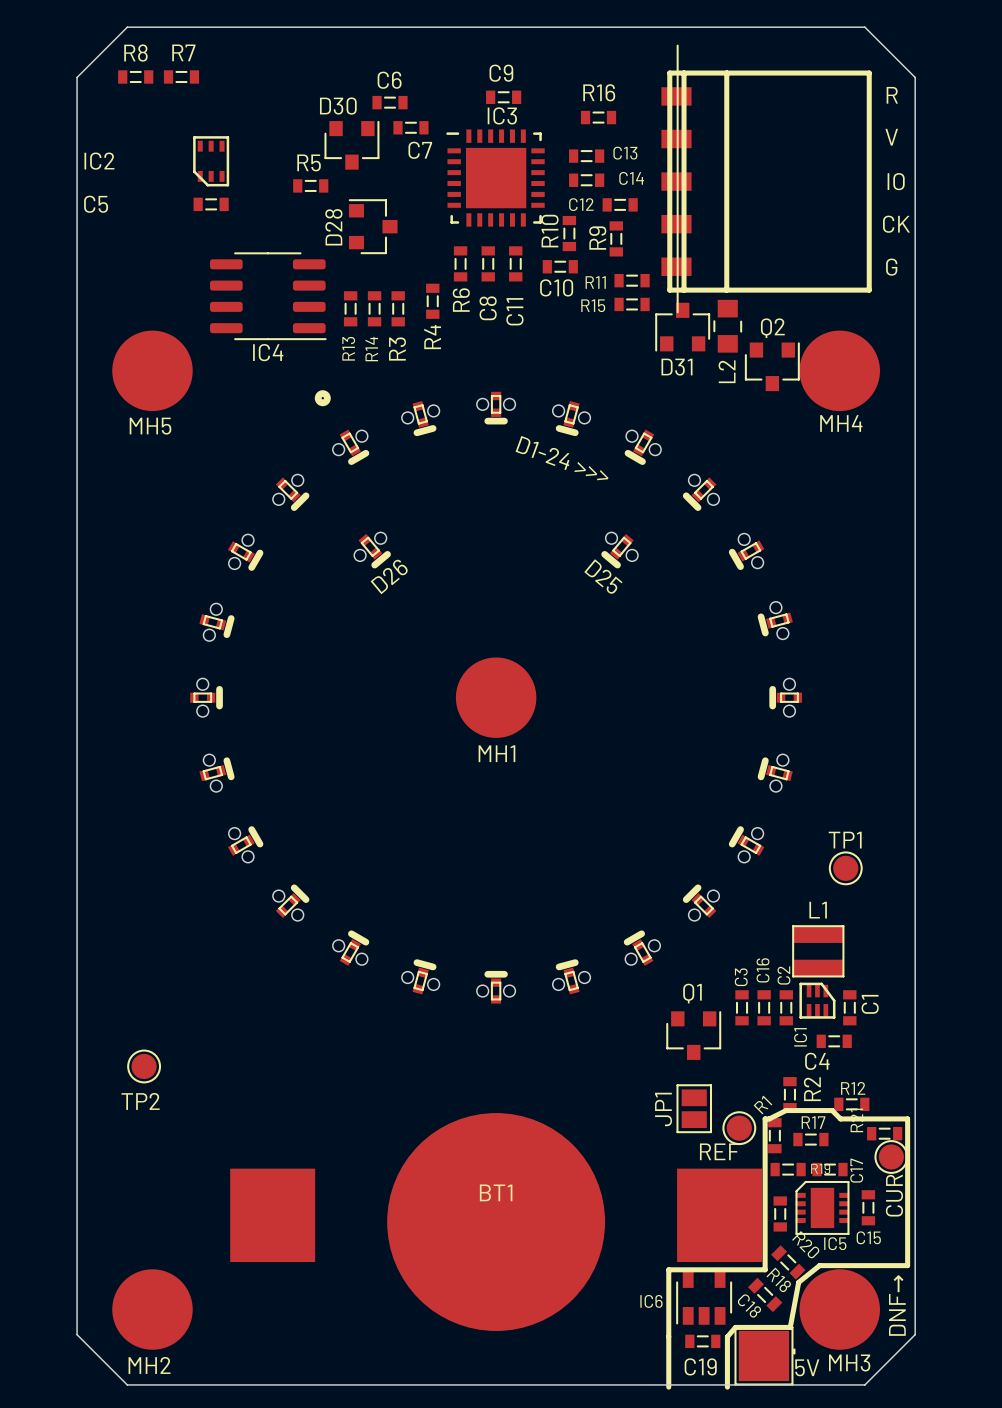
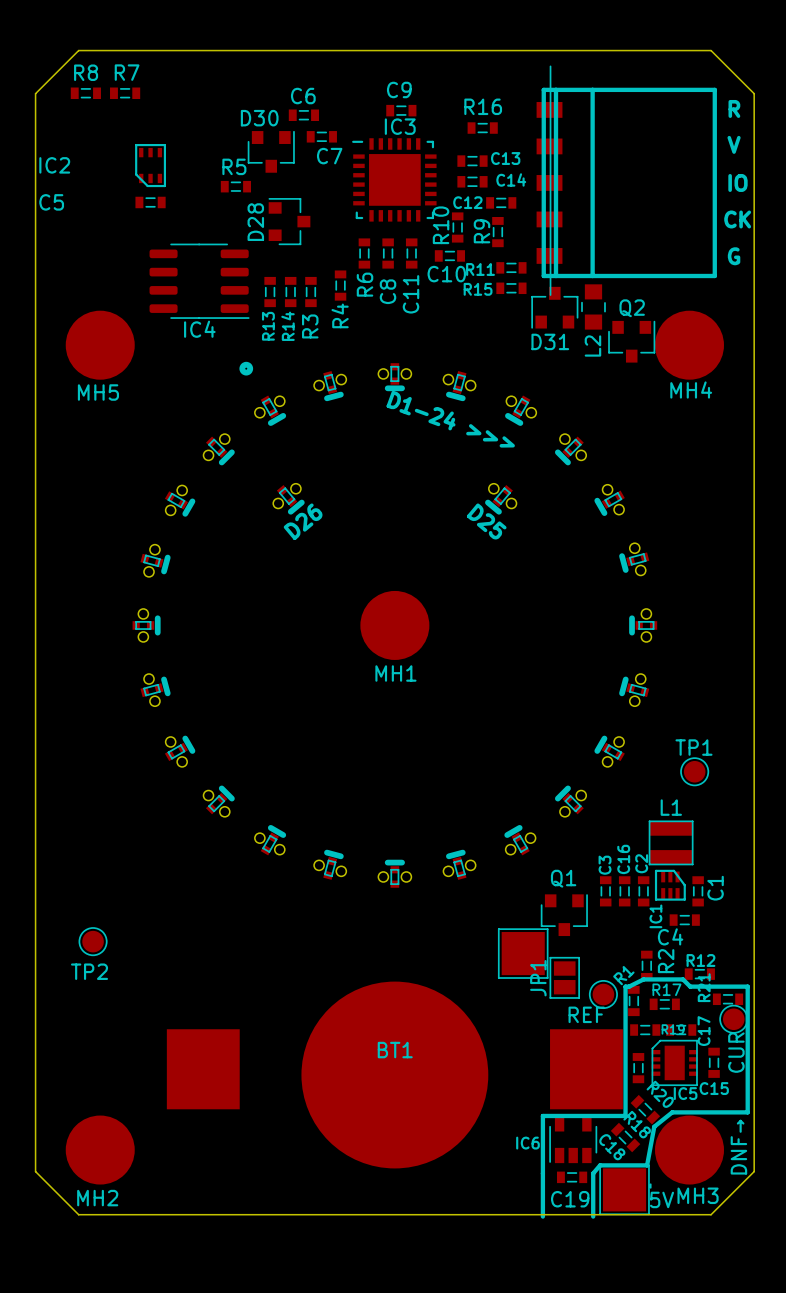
part: none -> (523, 953)

